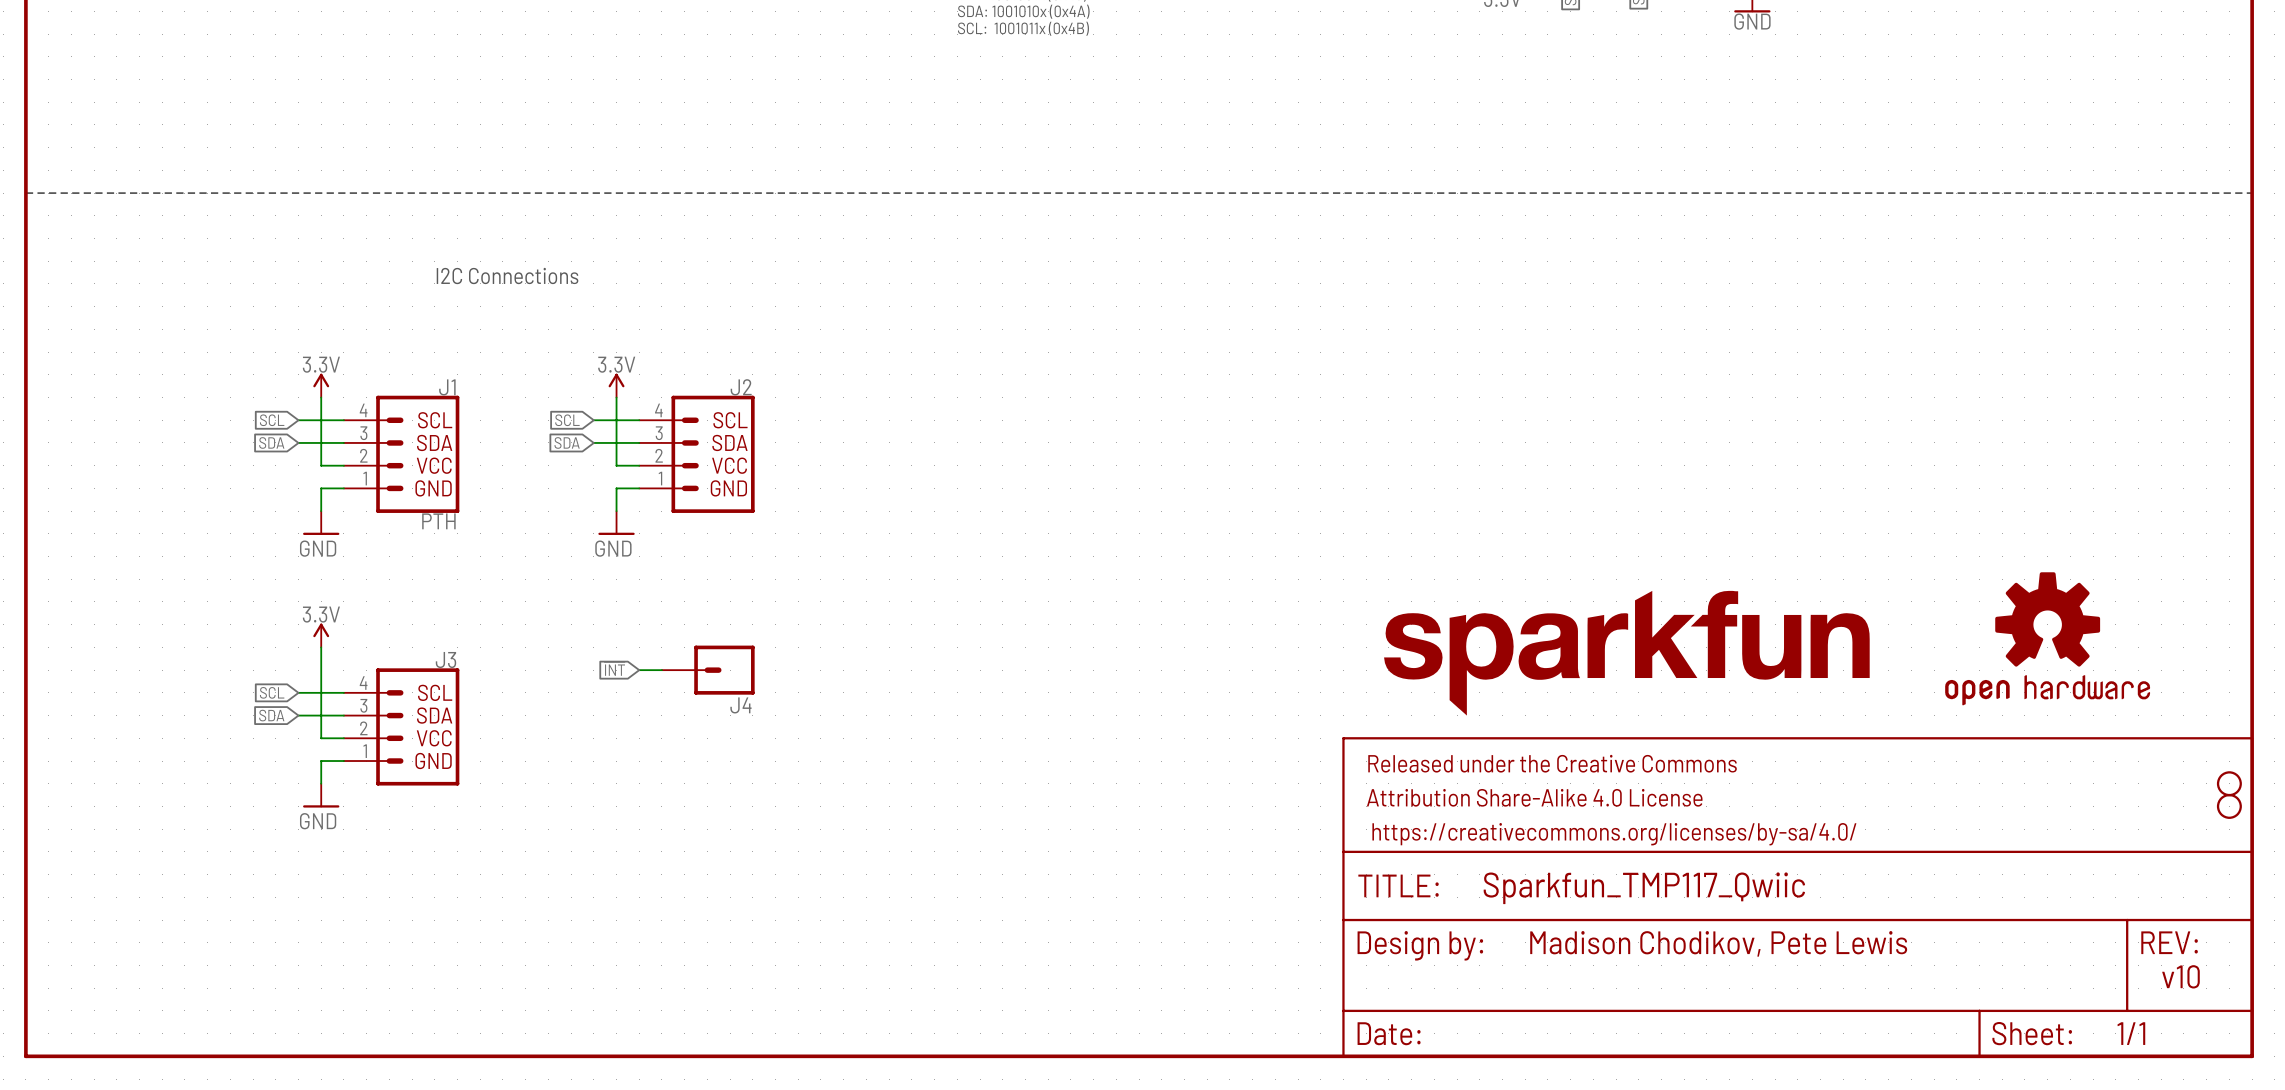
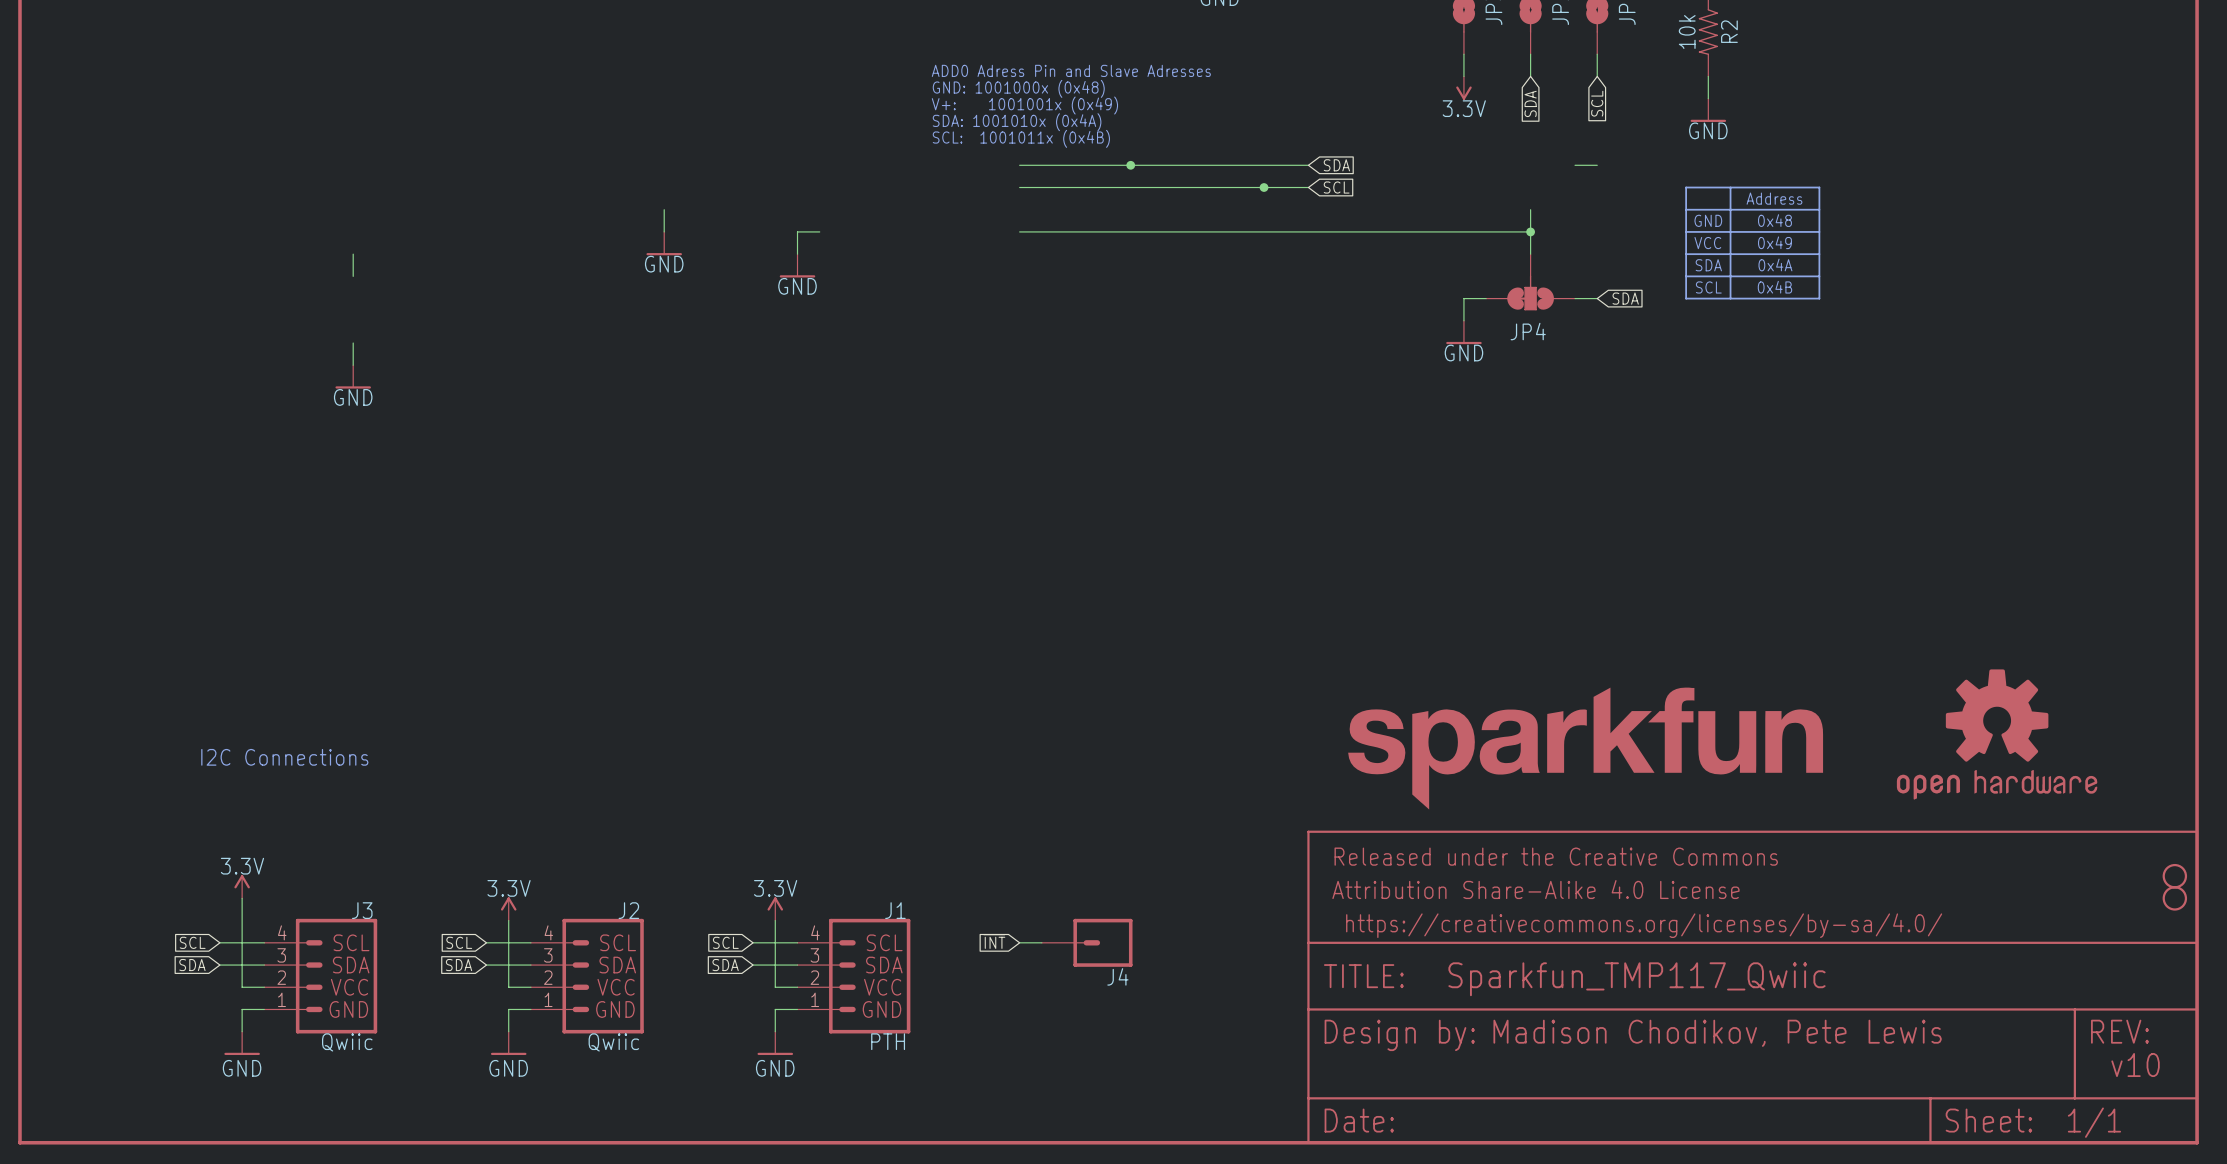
wire: none -> (1019, 165) (1308, 165)
junction: none -> (1130, 165)
global label: none -> SDA (1336, 165)
wire: none -> (1575, 165) (1597, 165)
wire: none -> (1019, 187) (1308, 187)
junction: none -> (1264, 187)
global label: none -> SCL (1336, 187)
line: none -> (1686, 187) (1686, 298) (1819, 298) (1819, 187) (1686, 187)
line: none -> (1730, 187) (1730, 298)
text: none -> Address (1774, 198)
wire: none -> (664, 209) (664, 231)
wire: none -> (1530, 209) (1530, 254)
line: none -> (1686, 209) (1819, 209)
text: none -> GND (1708, 220)
text: none -> 0x48 (1774, 220)
wire: none -> (819, 231) (797, 231) (797, 254)
wire: none -> (1019, 231) (1530, 231)
junction: none -> (1530, 231)
line: none -> (1686, 231) (1819, 231)
power symbol: none -> GND (664, 243)
text: none -> VCC (1707, 243)
text: none -> 0x49 (1774, 242)
wire: none -> (353, 254) (353, 276)
line: none -> (1686, 254) (1819, 254)
power symbol: none -> GND (797, 265)
text: none -> SDA (1708, 265)
text: none -> 0x4A (1775, 265)
line: none -> (1686, 276) (1819, 276)
JP4: none -> (1530, 282)
text: none -> SCL (1708, 287)
text: none -> 0x4B (1774, 287)
line: (25, 193) (2252, 193) -> none
wire: none -> (1486, 298) (1463, 298) (1463, 320)
global label: none -> SDA (1625, 298)
power symbol: none -> GND (1463, 332)
wire: none -> (353, 343) (353, 365)
power symbol: none -> GND (353, 376)
text: I2C Connections (507, 276) -> none
power symbol: 3.3V (321, 385) -> none
power symbol: 3.3V (616, 385) -> none
wire: (321, 397) (321, 465) (343, 465) -> none
wire: (616, 397) (616, 465) (639, 465) -> none
global label: SCL (272, 420) -> none
wire: (298, 420) (343, 420) -> none
global label: SCL (567, 420) -> none
wire: (593, 420) (639, 420) -> none
global label: SDA (271, 442) -> none
wire: (298, 442) (343, 442) -> none
global label: SDA (567, 442) -> none
wire: (593, 442) (639, 442) -> none
J1 position: (401, 454) -> (853, 976)
J2 position: (696, 454) -> (587, 976)
wire: (343, 488) (321, 488) (321, 511) -> none
wire: (639, 488) (616, 488) (616, 511) -> none
power symbol: GND (321, 523) -> none
power symbol: GND (616, 523) -> none
power symbol: 3.3V (321, 635) -> none
wire: (321, 647) (321, 738) (343, 738) -> (242, 898) (242, 987) (264, 987)
text: none -> I2C Connections (284, 757)
global label: ~{INT} (614, 668) -> none
wire: (639, 670) (661, 670) -> none
J4 position: (708, 670) -> (1087, 942)
global label: SCL (272, 692) -> none
wire: (298, 692) (343, 692) -> (219, 942) (264, 942)
global label: SDA (271, 715) -> none
wire: (298, 715) (343, 715) -> (219, 965) (264, 965)
J3 position: (401, 726) -> (320, 976)
wire: (343, 761) (321, 761) (321, 783) -> (264, 1009) (242, 1009) (242, 1031)
power symbol: none -> 3.3V (242, 886)
power symbol: GND (321, 795) -> none
power symbol: none -> 3.3V (508, 908)
power symbol: none -> 3.3V (775, 908)
wire: none -> (508, 920) (508, 987) (530, 987)
wire: none -> (775, 920) (775, 987) (797, 987)
global label: none -> ~{INT} (994, 941)
global label: none -> SCL (192, 942)
global label: none -> SCL (459, 942)
wire: none -> (486, 942) (530, 942)
global label: none -> SCL (725, 942)
wire: none -> (753, 942) (797, 942)
wire: none -> (1019, 942) (1041, 942)
global label: none -> SDA (192, 965)
global label: none -> SDA (459, 965)
wire: none -> (486, 965) (530, 965)
global label: none -> SDA (725, 965)
wire: none -> (753, 965) (797, 965)
wire: none -> (530, 1009) (508, 1009) (508, 1031)
wire: none -> (797, 1009) (775, 1009) (775, 1031)
power symbol: none -> GND (242, 1043)
J3 value: none -> Qwiic (347, 1042)
power symbol: none -> GND (508, 1043)
J2 value: none -> Qwiic (613, 1042)
power symbol: none -> GND (775, 1043)

